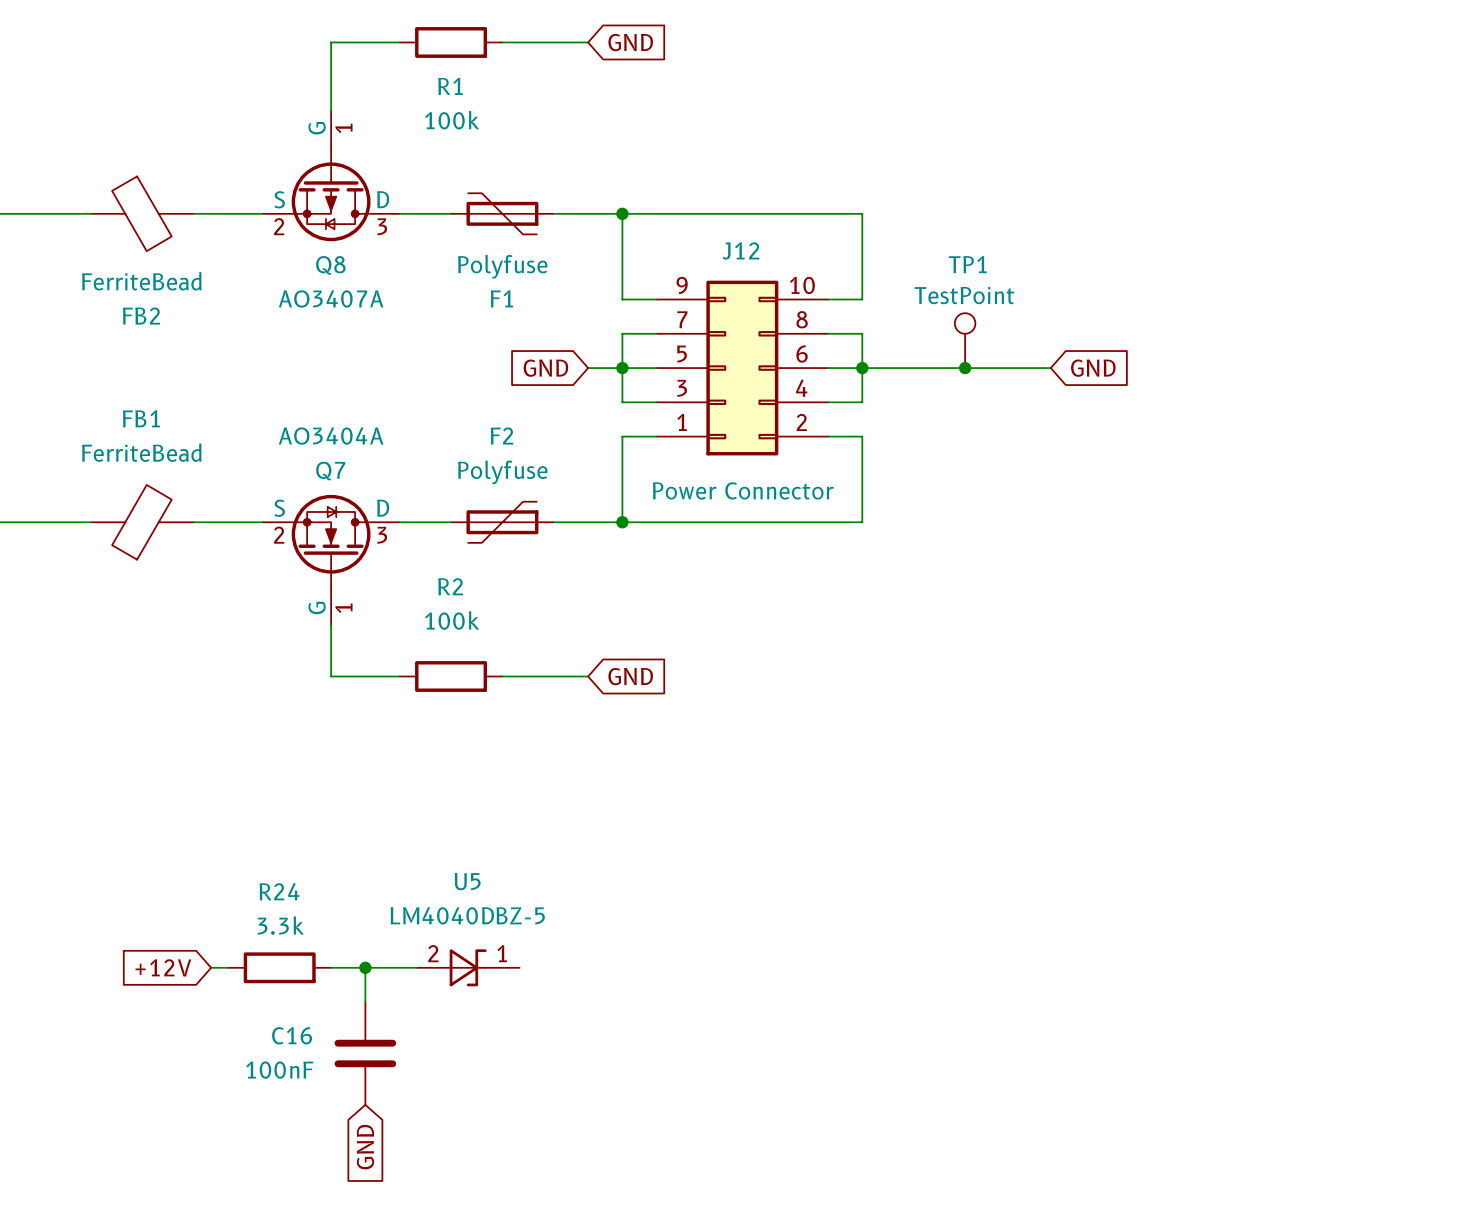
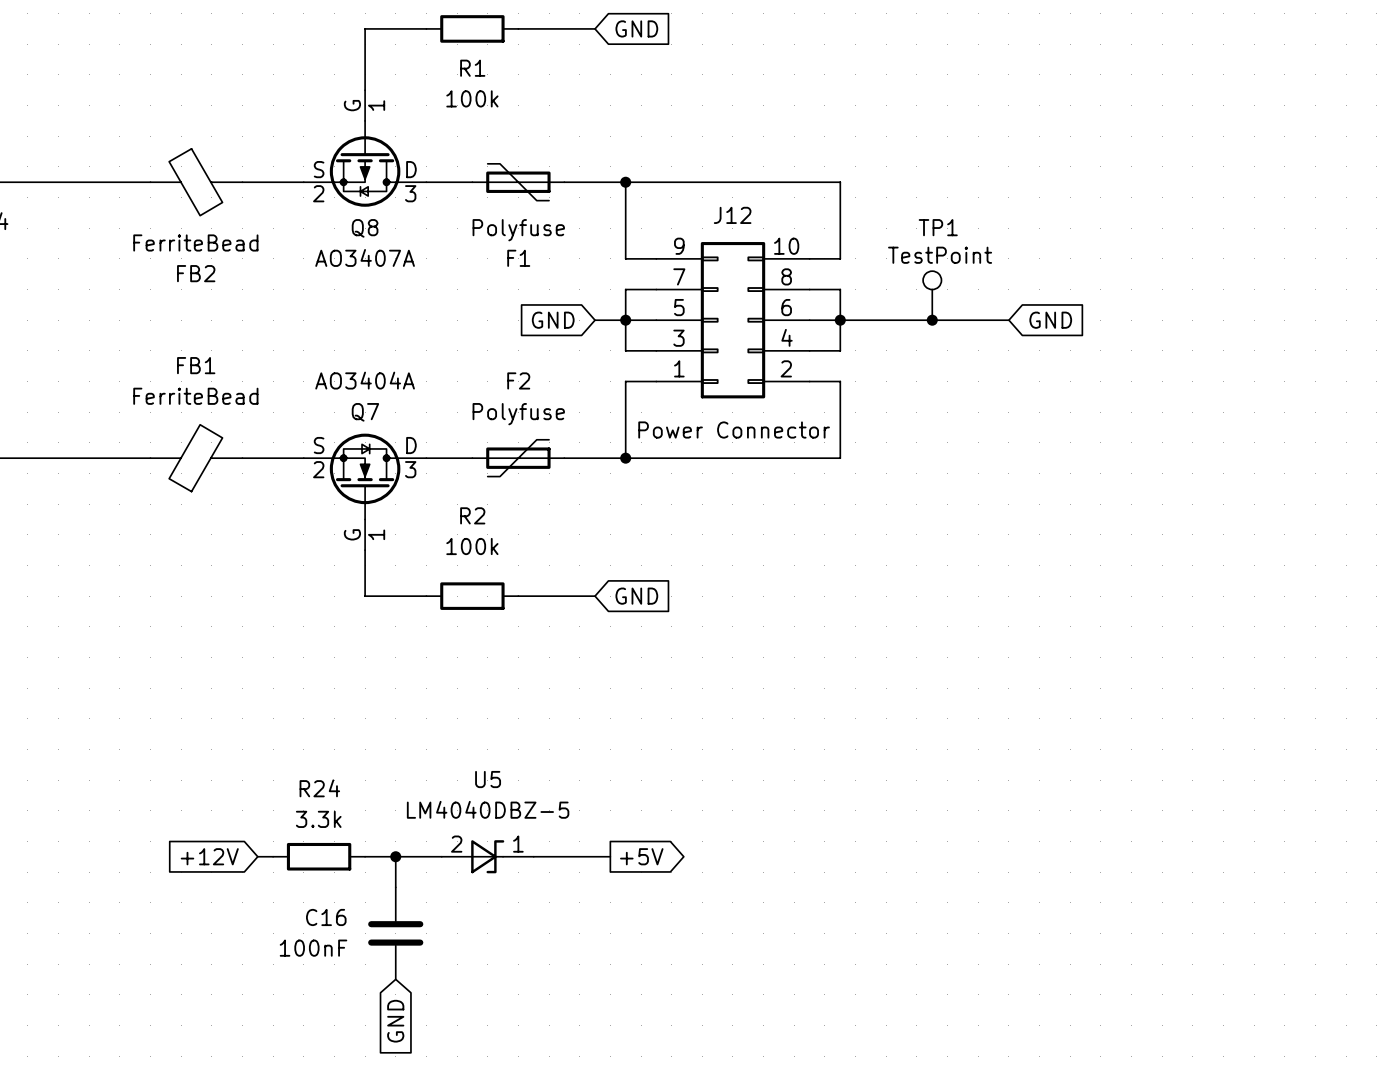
wire: none -> (533, 856) (610, 856)
global label: none -> +5V (641, 856)

